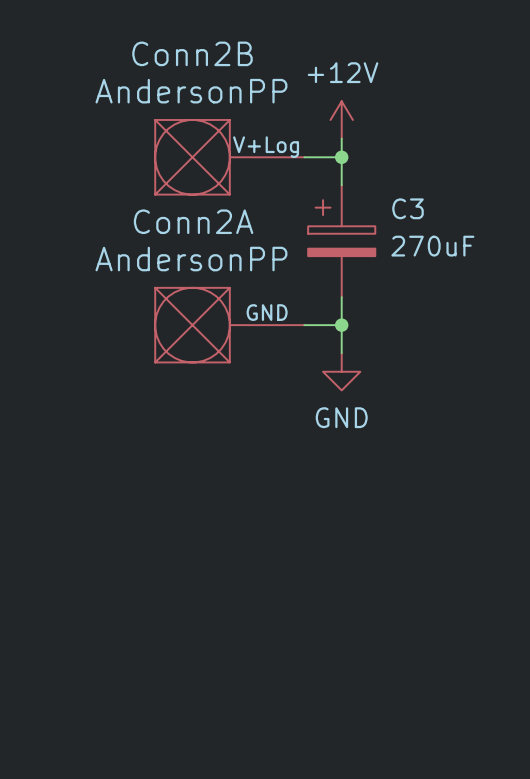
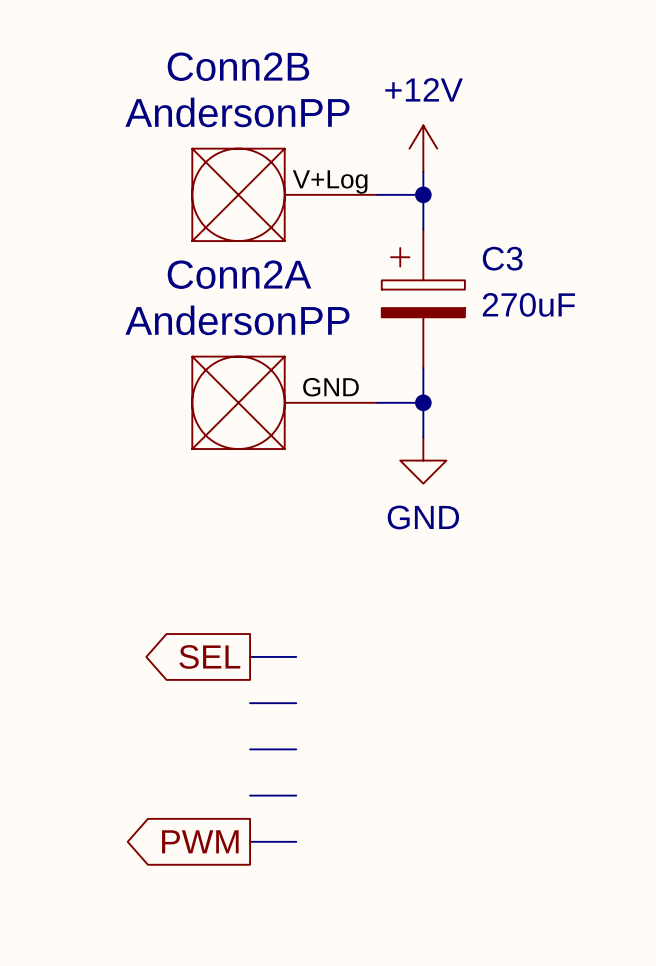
global label: none -> SEL (209, 656)
wire: none -> (250, 656) (296, 656)
wire: none -> (250, 703) (296, 703)
wire: none -> (250, 749) (296, 749)
wire: none -> (250, 795) (296, 795)
global label: none -> PWM (200, 841)
wire: none -> (250, 841) (296, 841)

